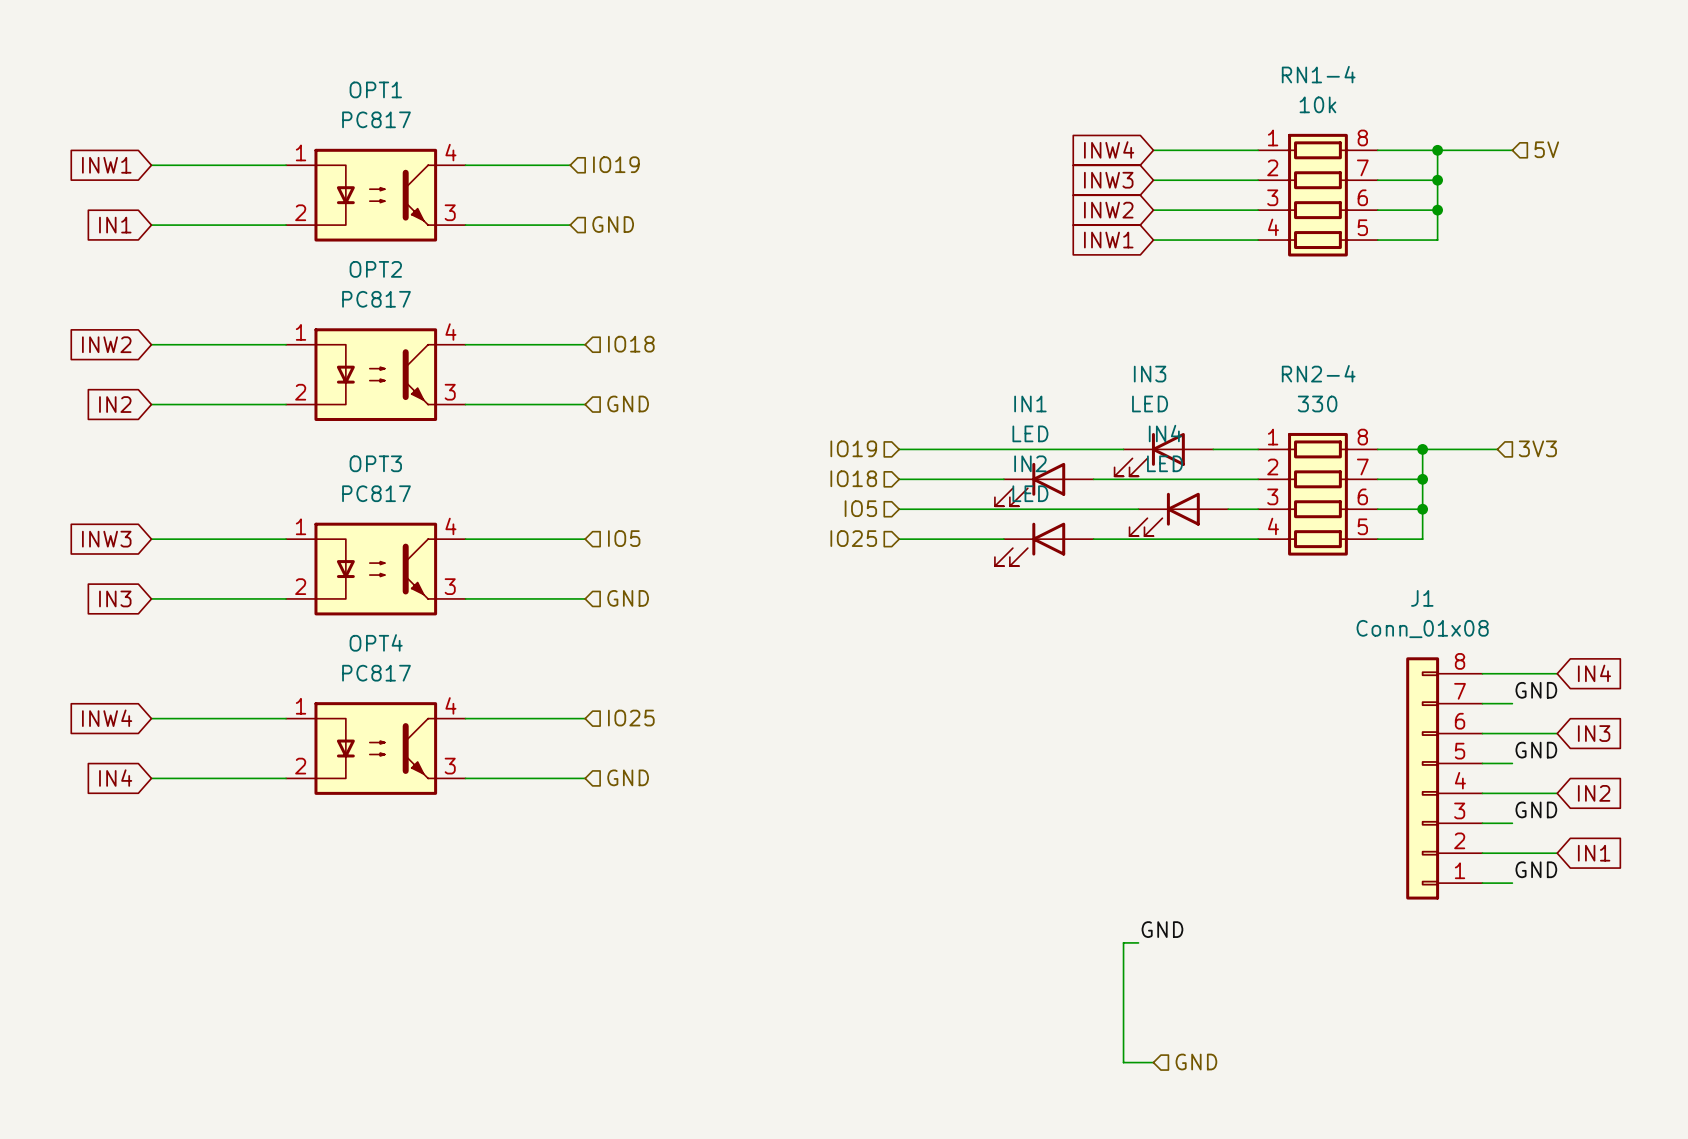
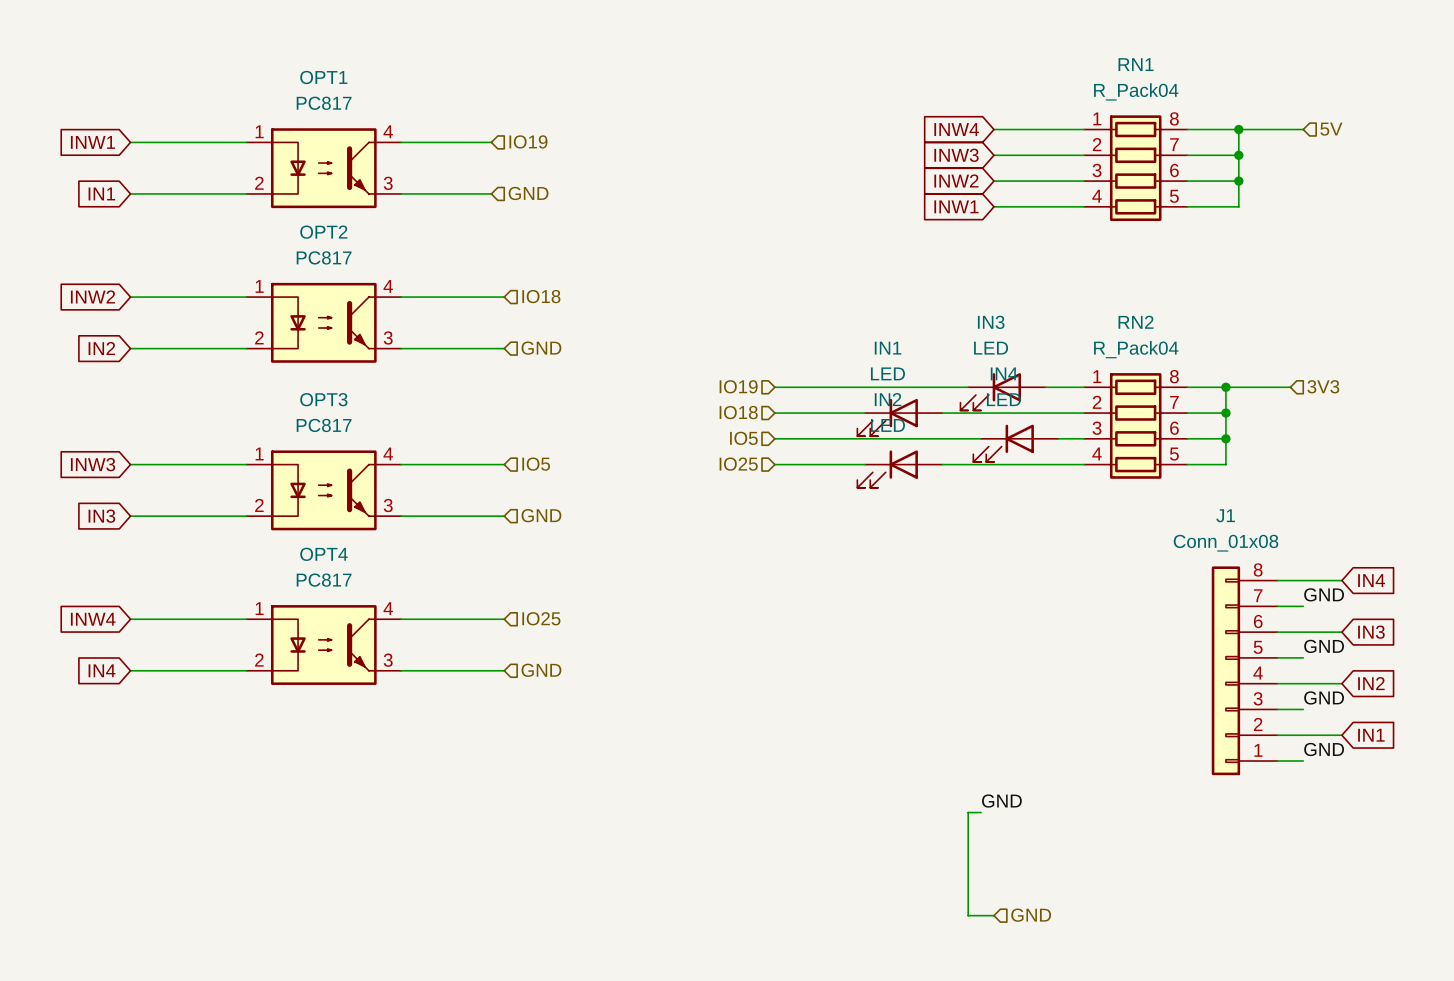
RN1-4 name: RN1-4 (1318, 74) -> RN1 (1136, 64)
RN1-4 value: 10k (1317, 104) -> R_Pack04 (1136, 91)
RN2-4 name: RN2-4 (1318, 373) -> RN2 (1136, 322)
RN2-4 value: 330 (1317, 403) -> R_Pack04 (1136, 349)

